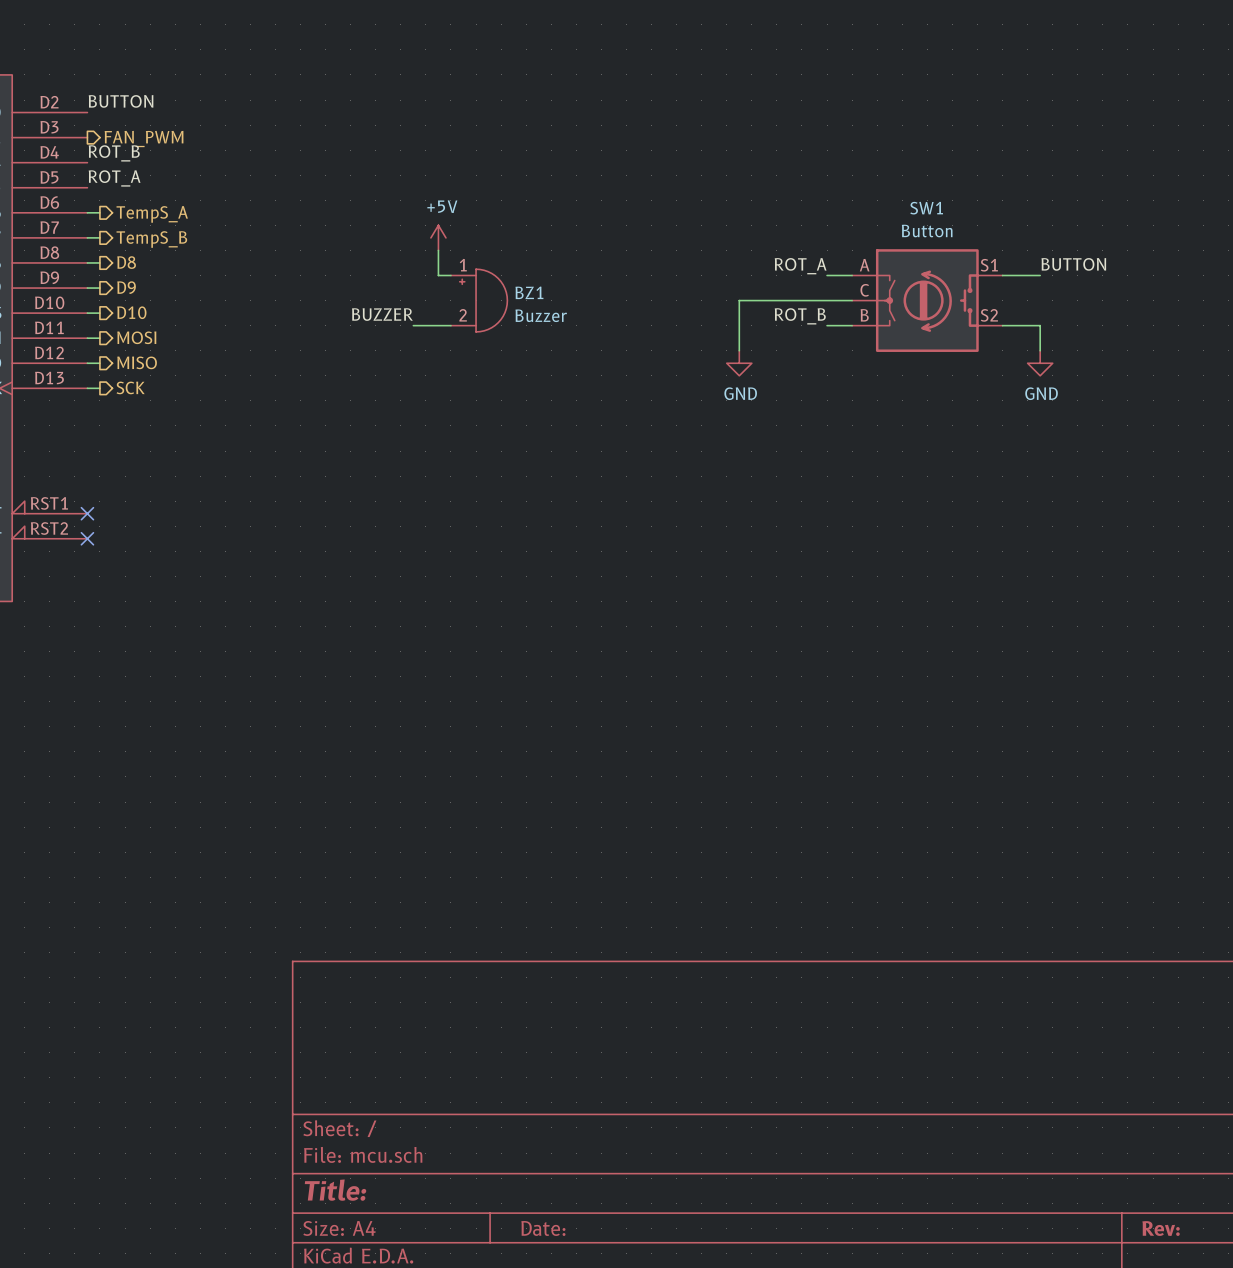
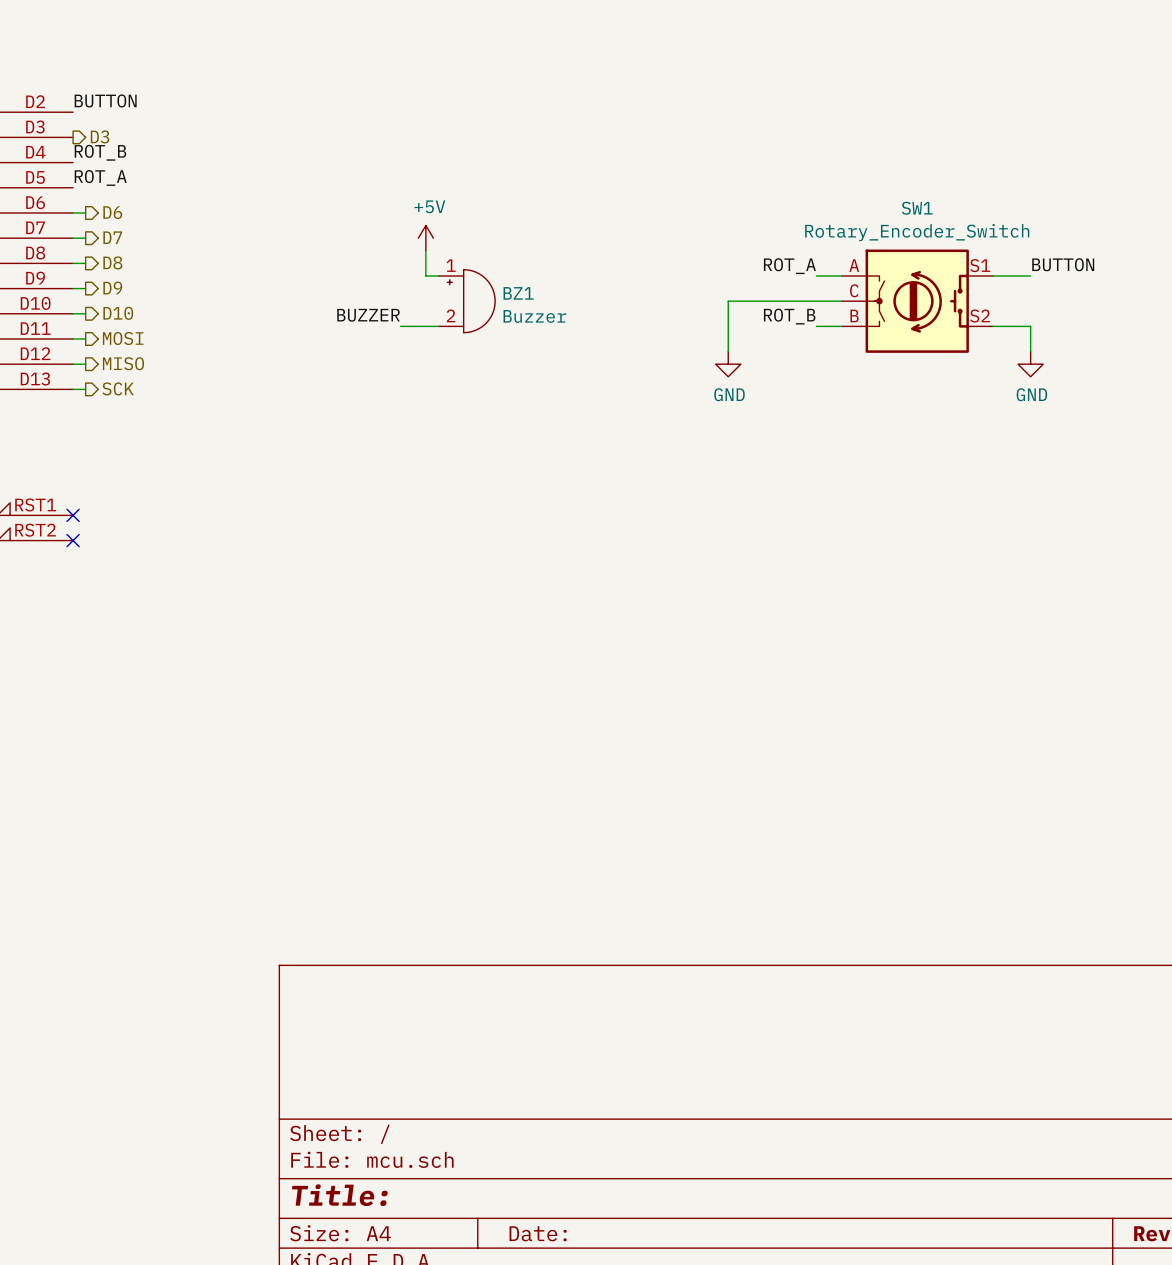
hierarchical label: FAN_PWM (144, 139) -> D3 (100, 136)
hierarchical label: TempS_A (152, 214) -> D6 (112, 212)
SW1 value: Button (927, 231) -> Rotary_Encoder_Switch (917, 232)
hierarchical label: TempS_B (151, 239) -> D7 (112, 237)

